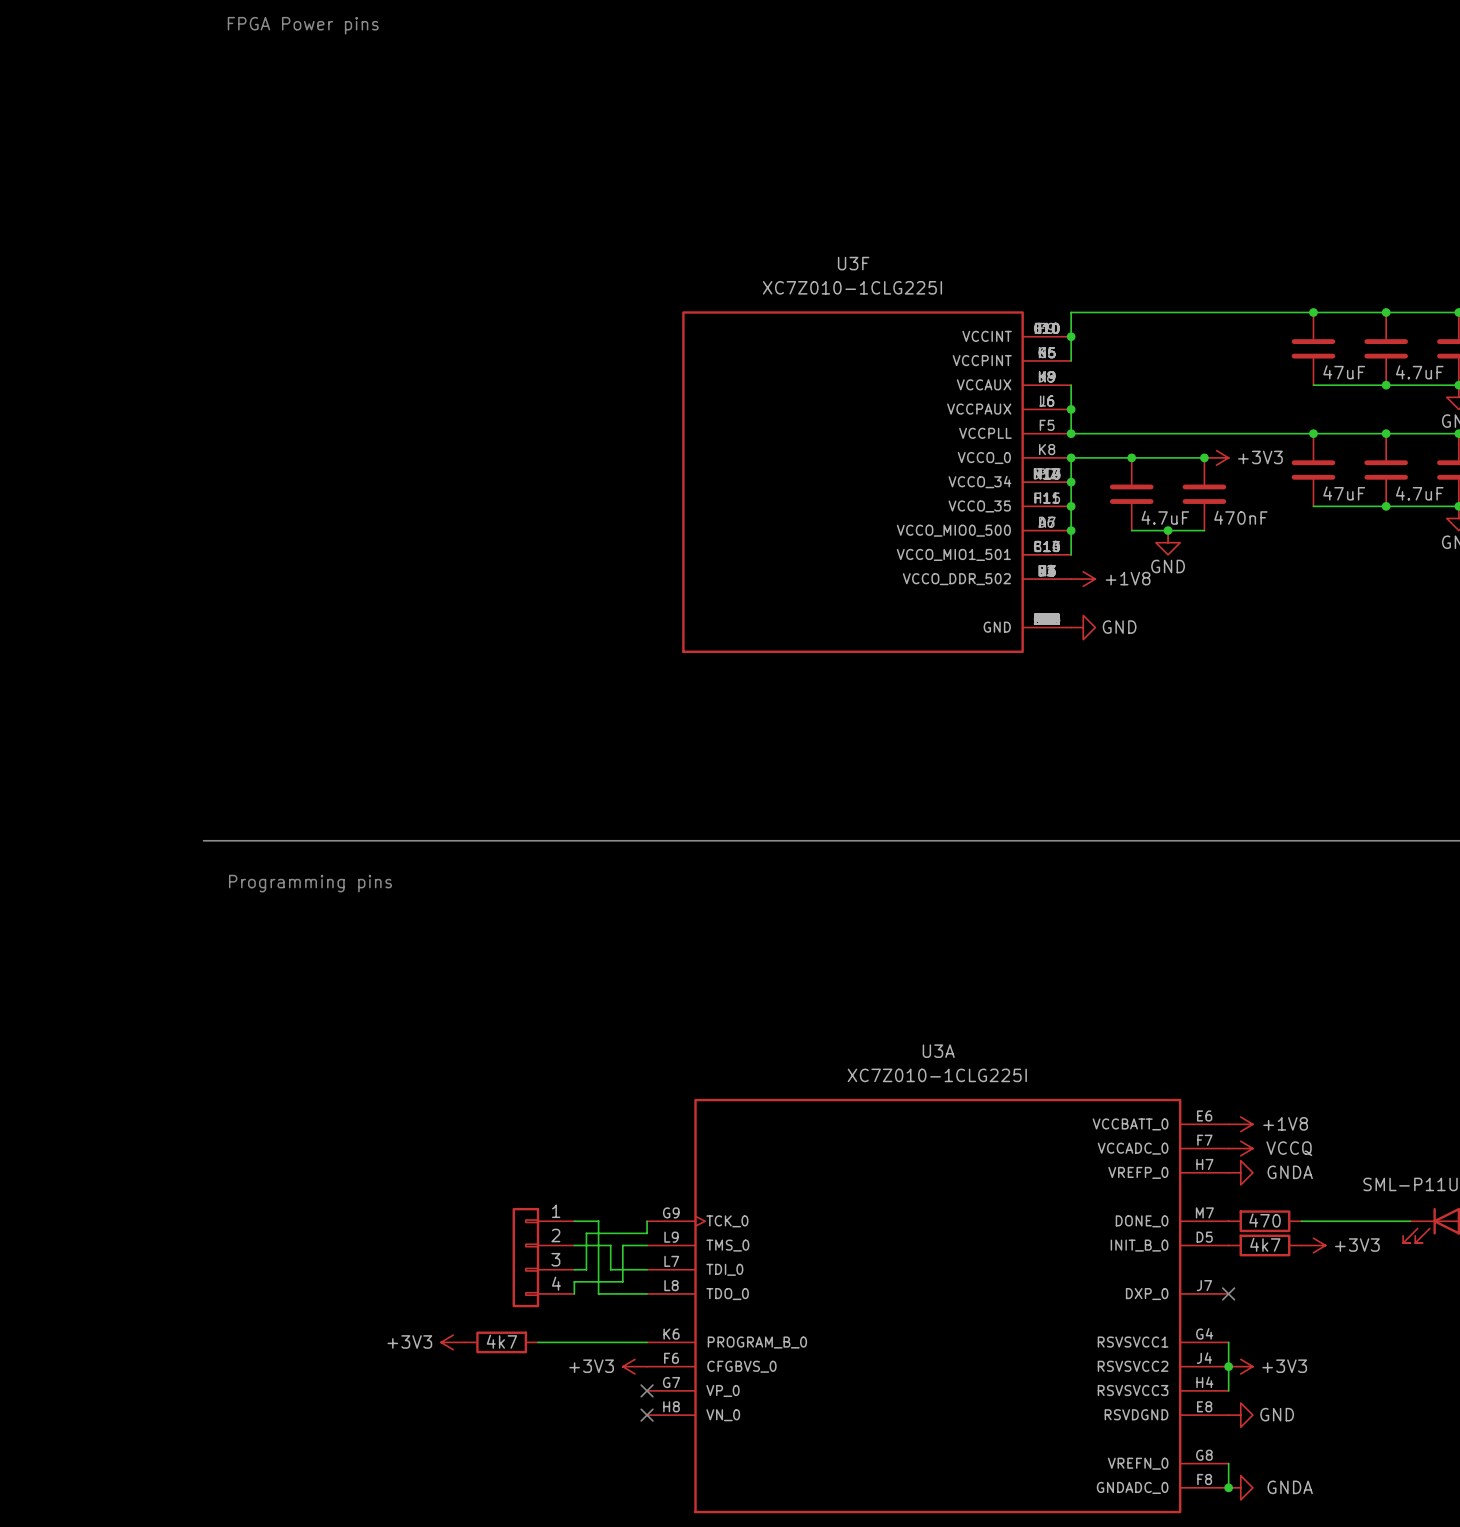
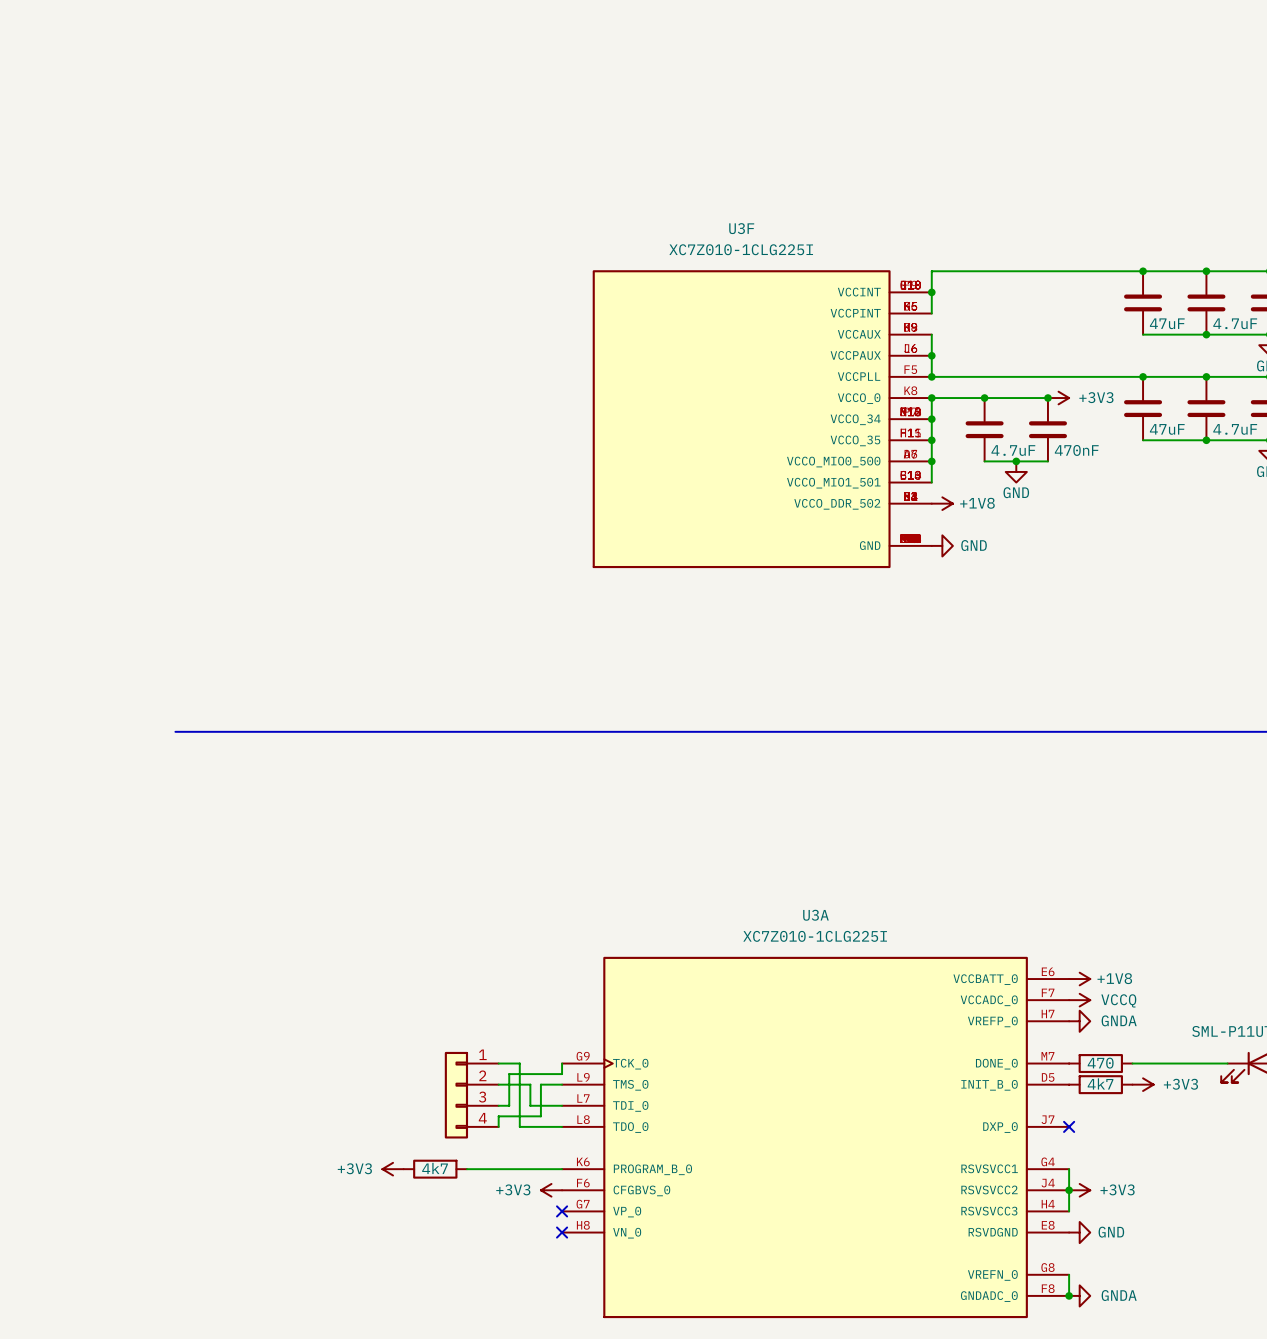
text: FPGA Power pins (303, 25) -> none
text: Programming pins (310, 883) -> none

